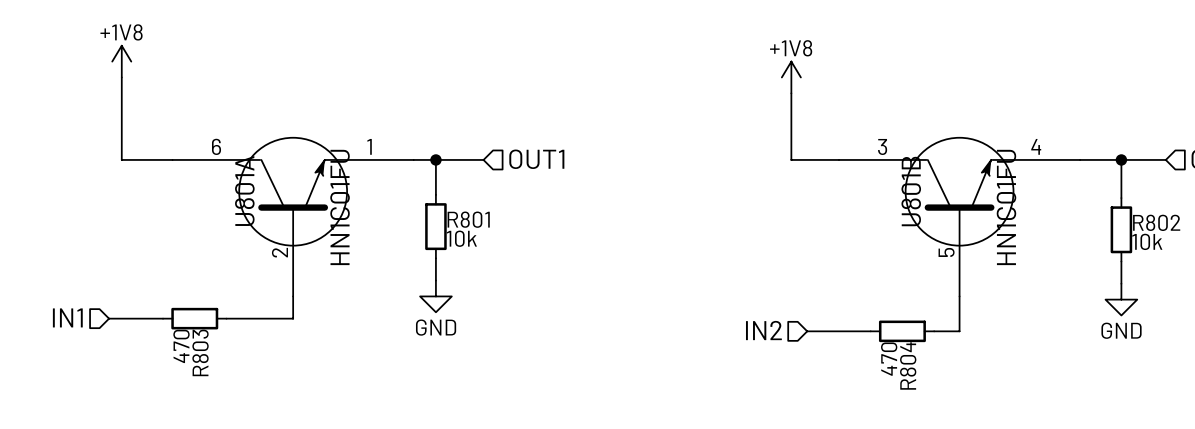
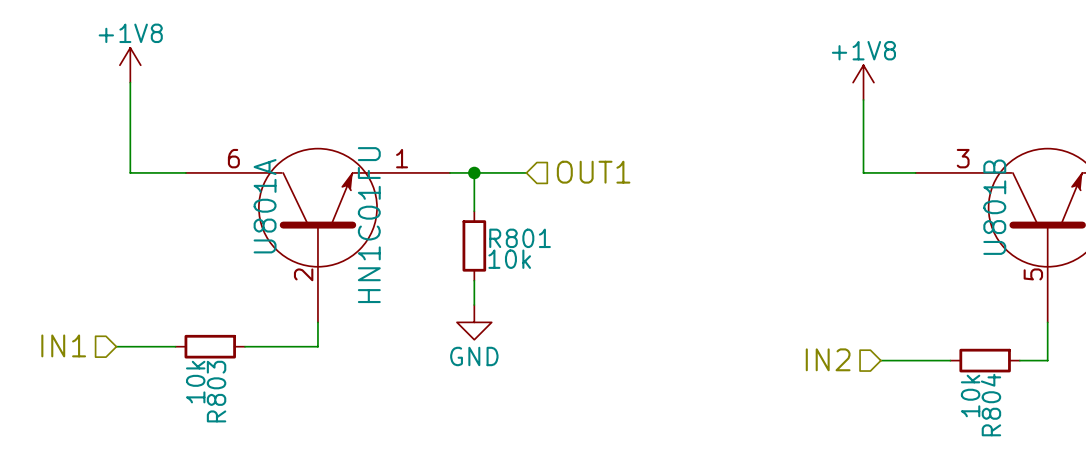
R803 value: 470 (181, 346) -> 10k (195, 382)
R804 value: 470 (889, 359) -> 10k (970, 395)

